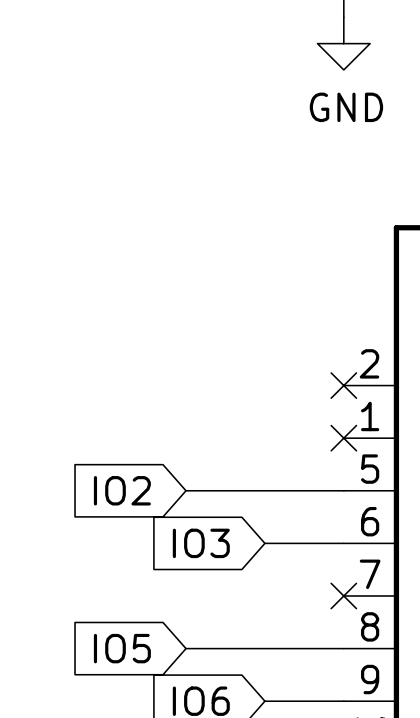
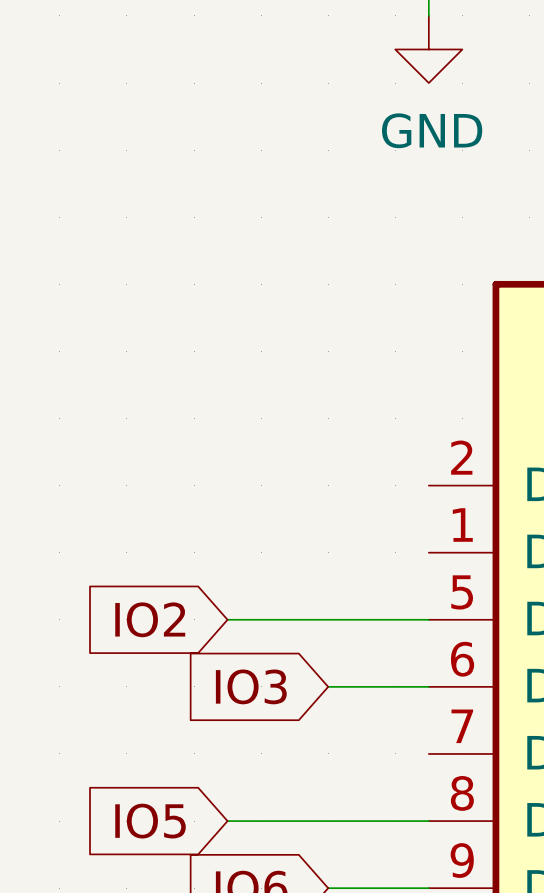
no-connect mark: (343, 385) -> none
no-connect mark: (343, 438) -> none
no-connect mark: (343, 595) -> none

